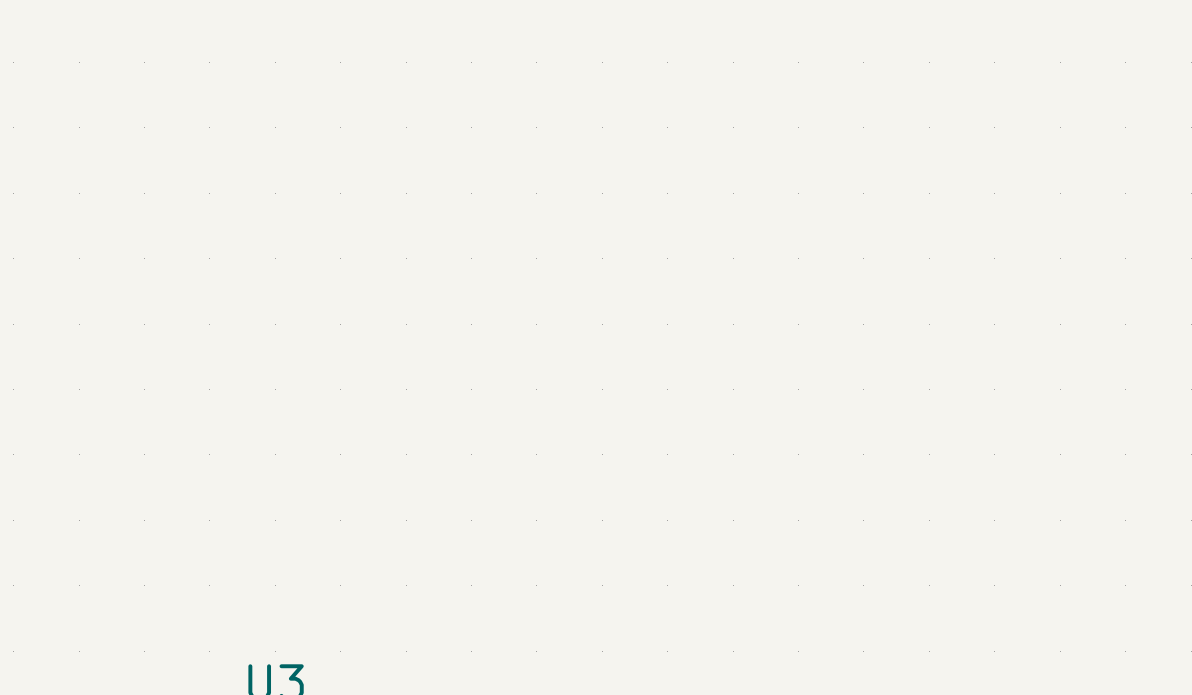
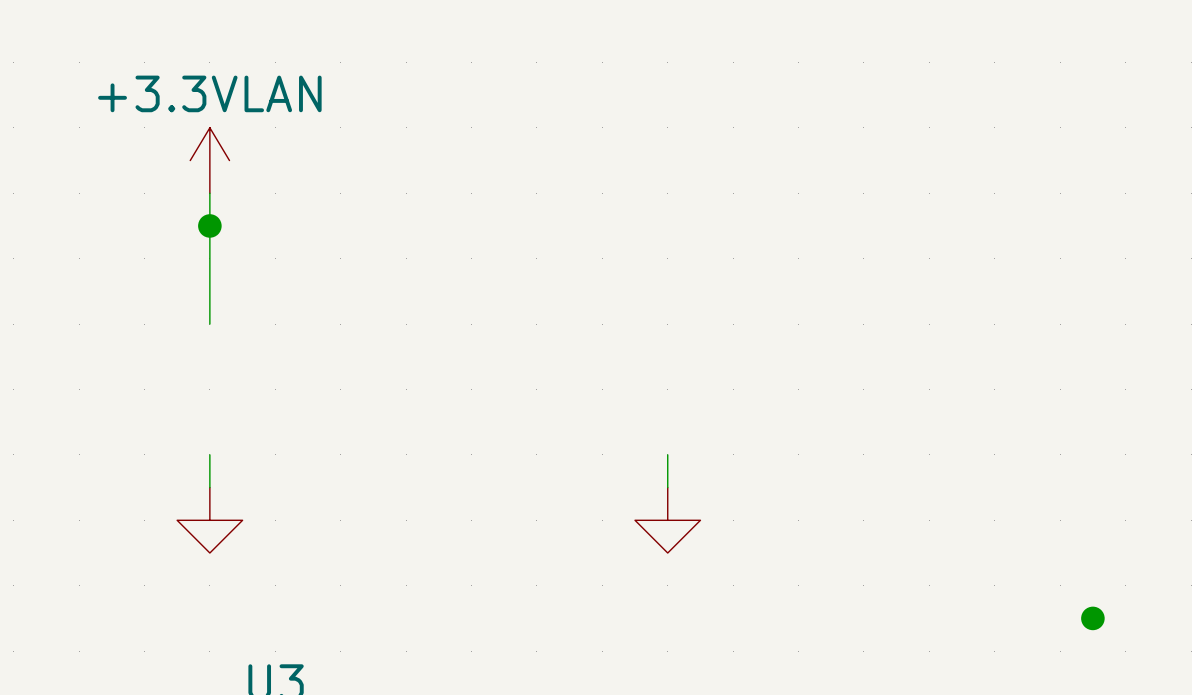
power symbol: none -> +3.3VLAN (209, 160)
wire: none -> (209, 193) (209, 324)
junction: none -> (209, 225)
wire: none -> (209, 454) (209, 487)
wire: none -> (667, 454) (667, 487)
power symbol: none -> (209, 520)
power symbol: none -> (667, 520)
junction: none -> (1092, 618)

